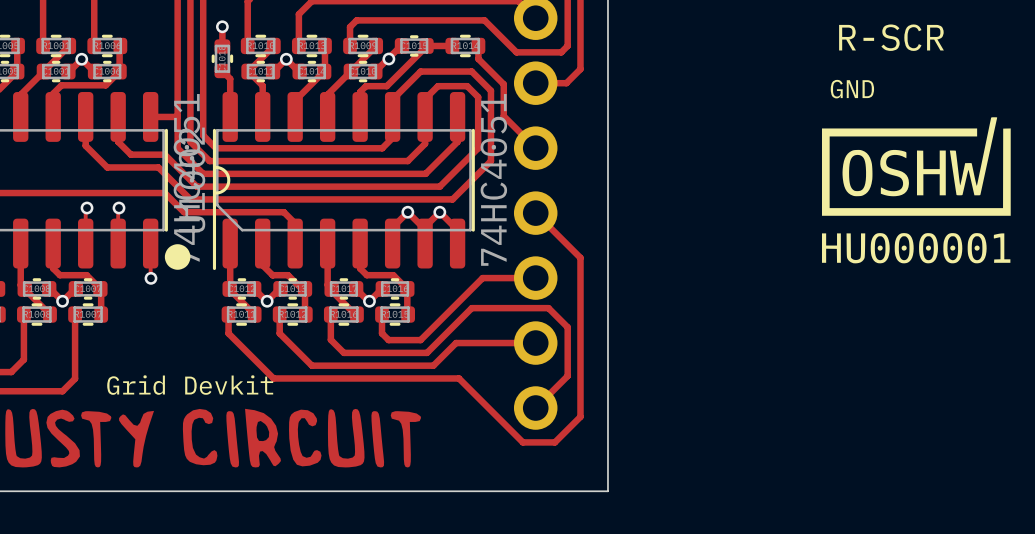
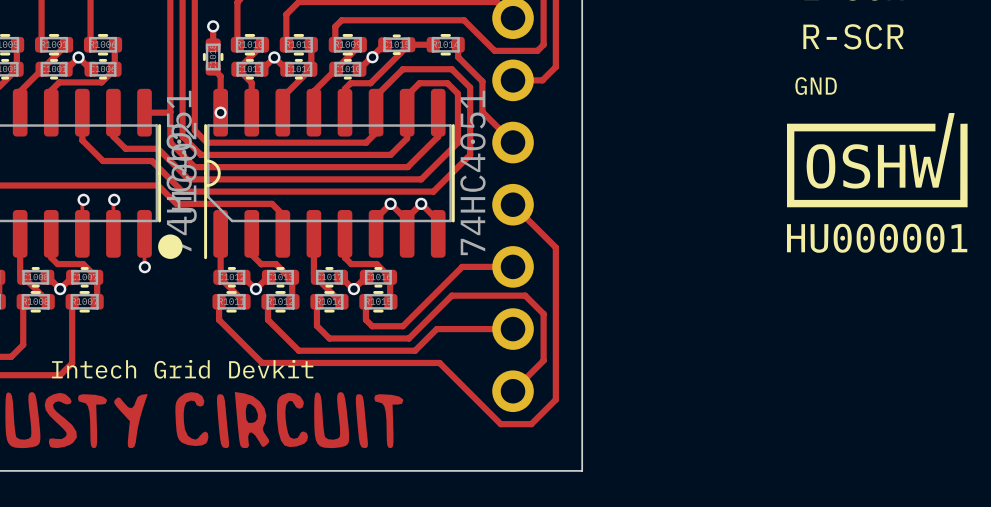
via: none -> (220, 112)
text: Grid Devkit (190, 385) -> Intech Grid Devkit (182, 369)

